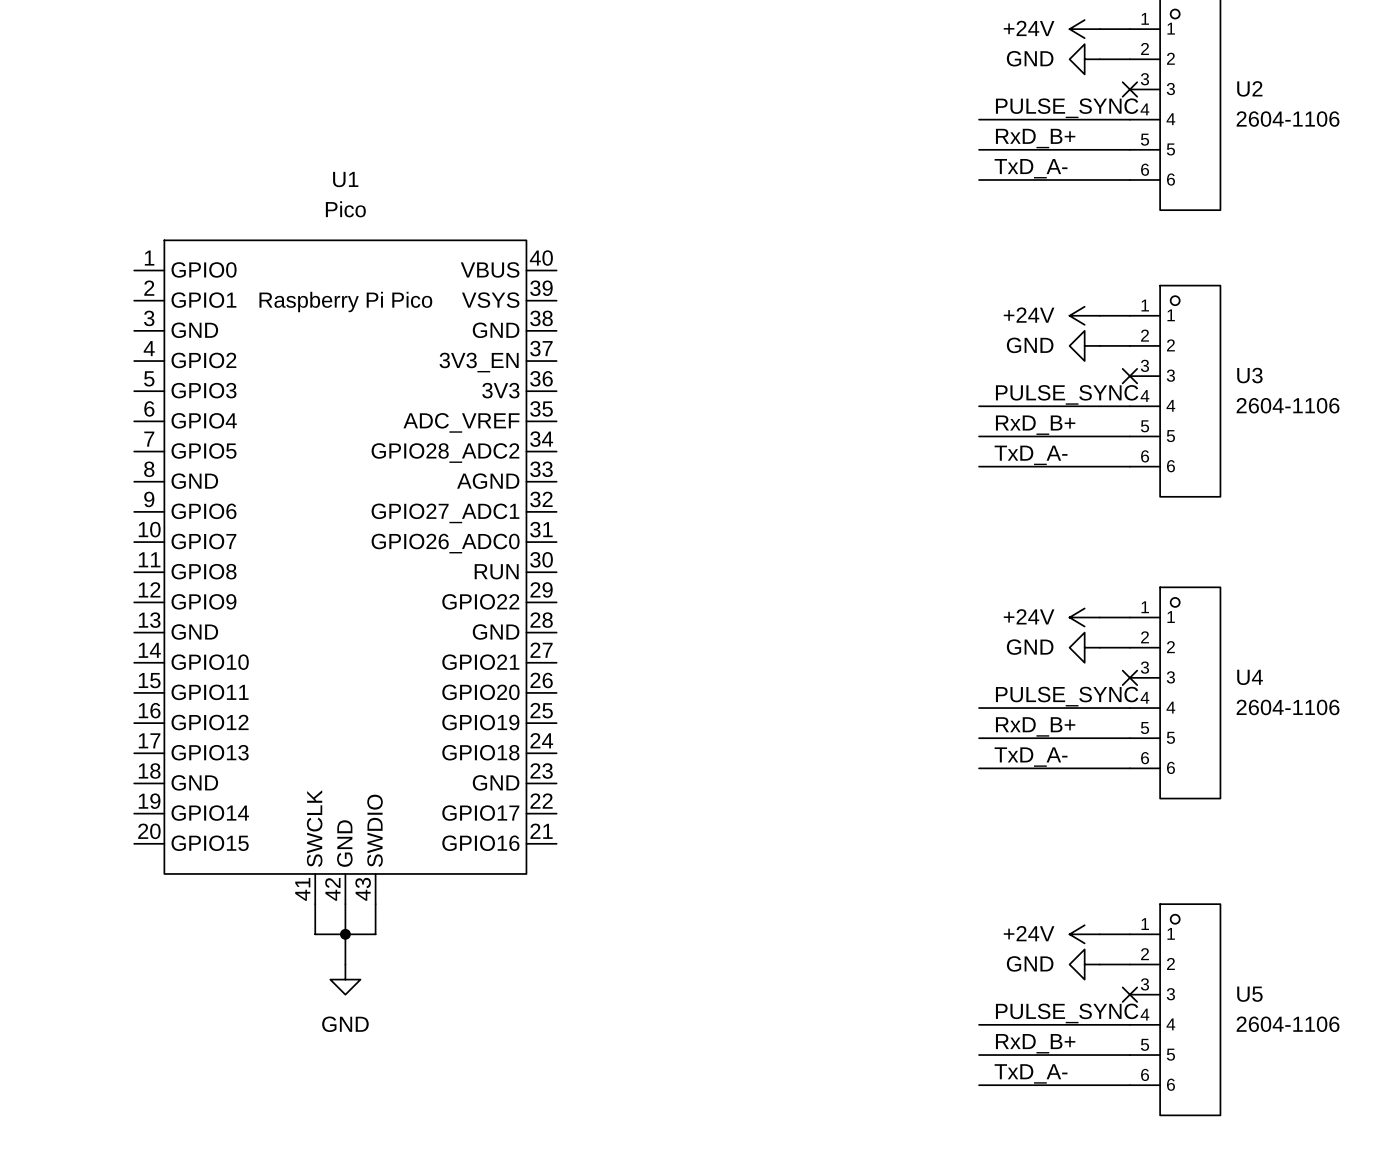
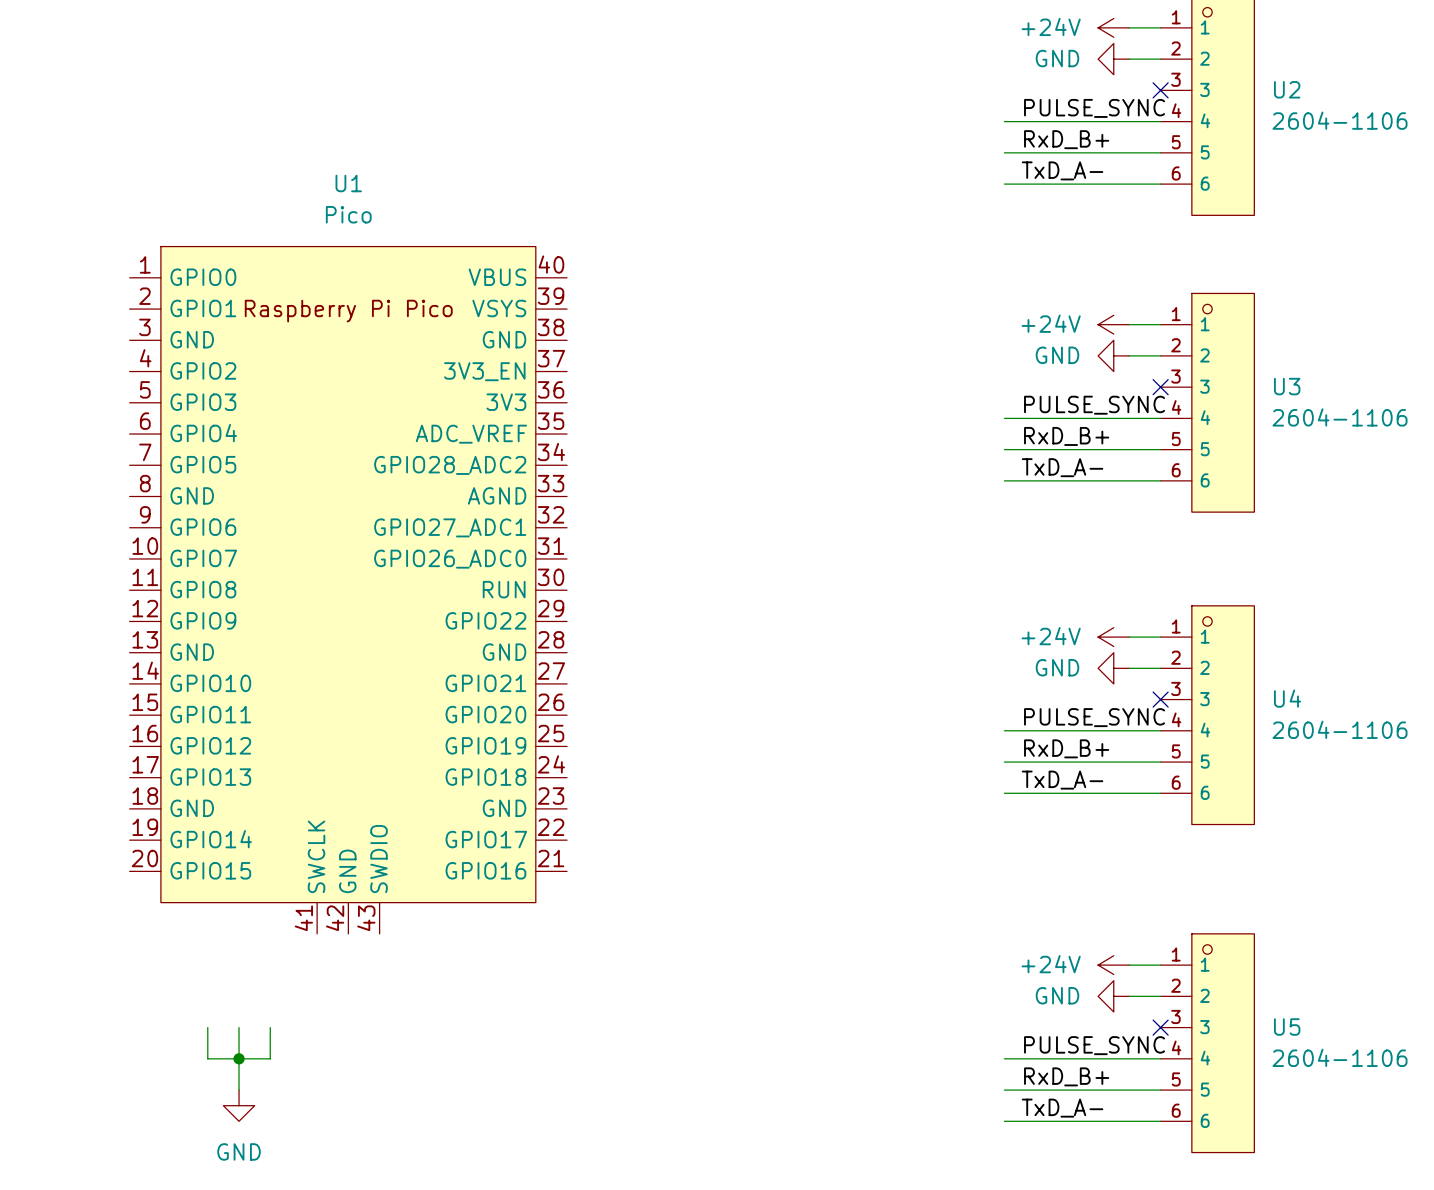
wire: (315, 904) (315, 934) (375, 934) (375, 904) -> (207, 1027) (207, 1058) (270, 1058) (270, 1027)
wire: (345, 904) (345, 964) -> (239, 1027) (239, 1090)
junction: (345, 934) -> none
power symbol position: GND (345, 979) -> GND (239, 1105)
junction: none -> (239, 1058)

